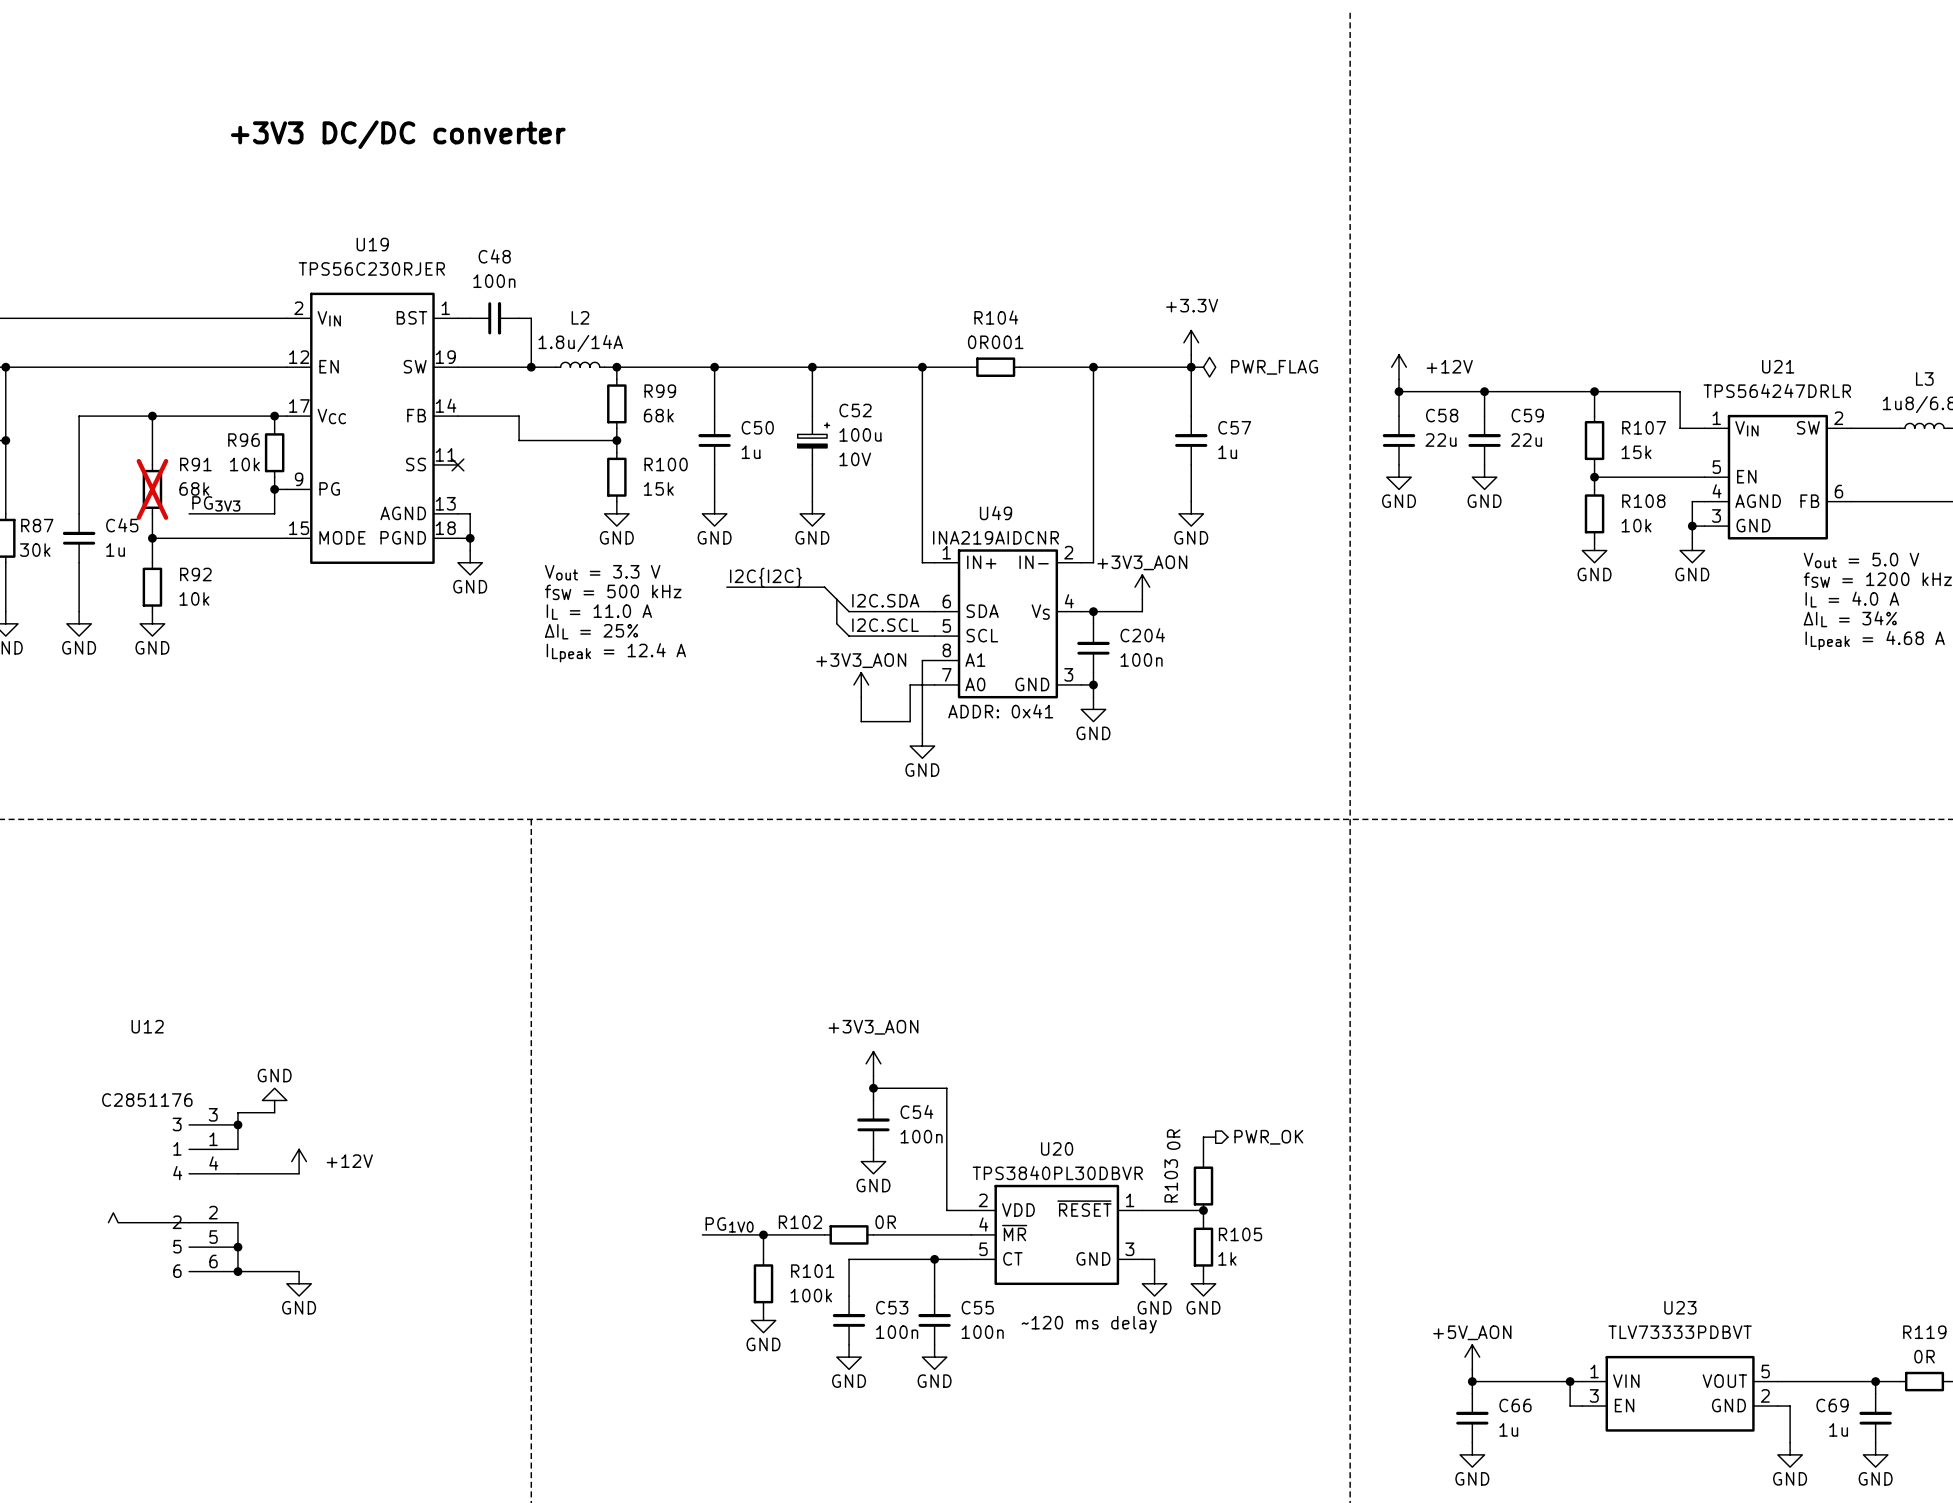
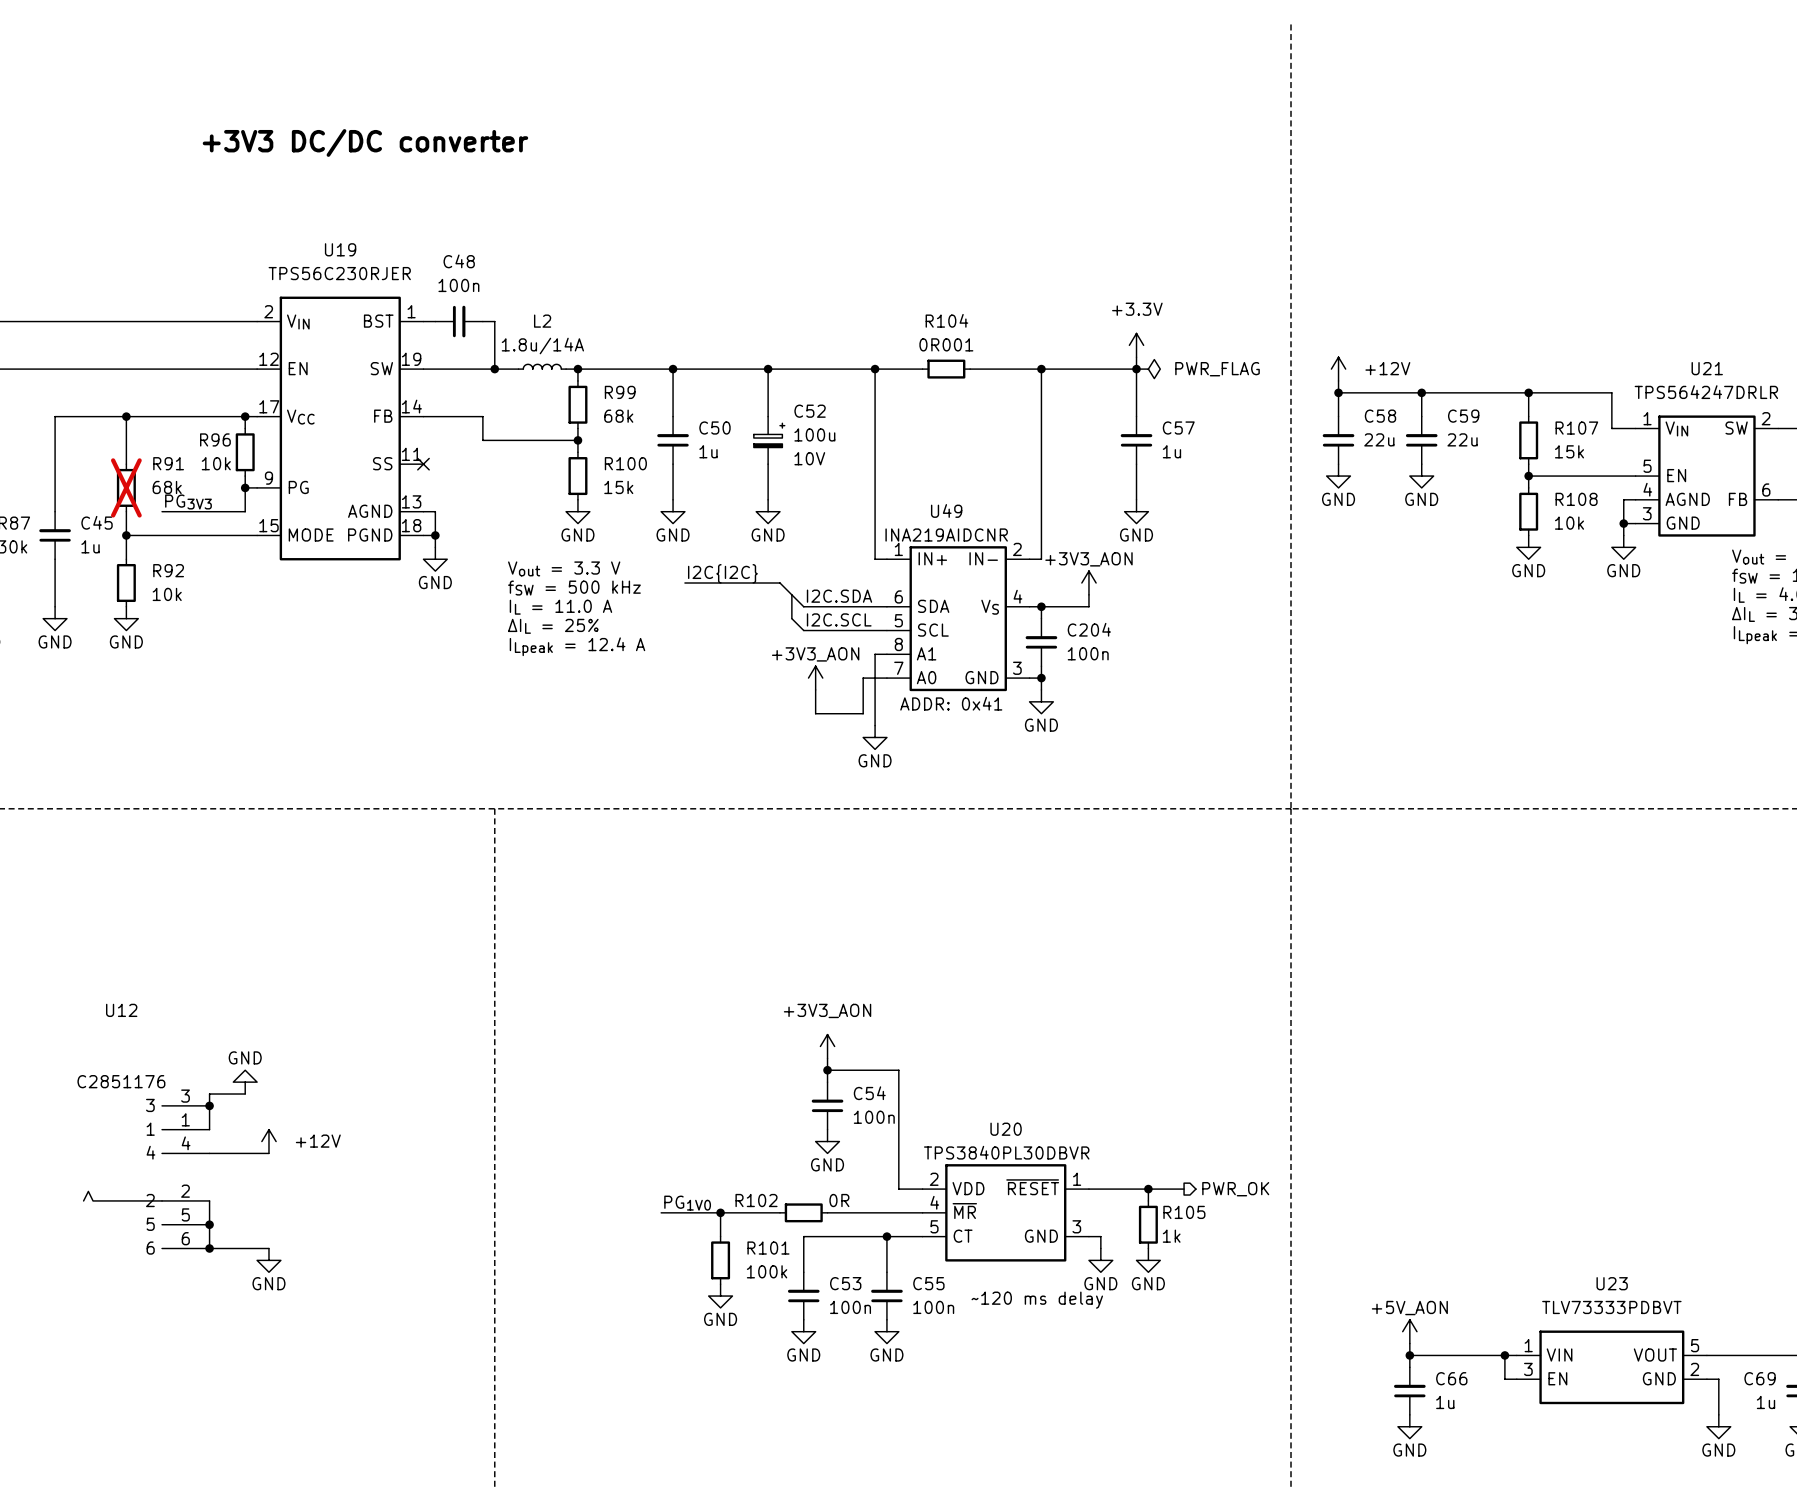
wire: (1215, 1137) (1203, 1137) (1203, 1161) -> none
hierarchical label position: PWR_OK (1268, 1137) -> PWR_OK (1235, 1189)
R103: (1203, 1186) -> none
wire: none -> (1148, 1189) (1184, 1189)

